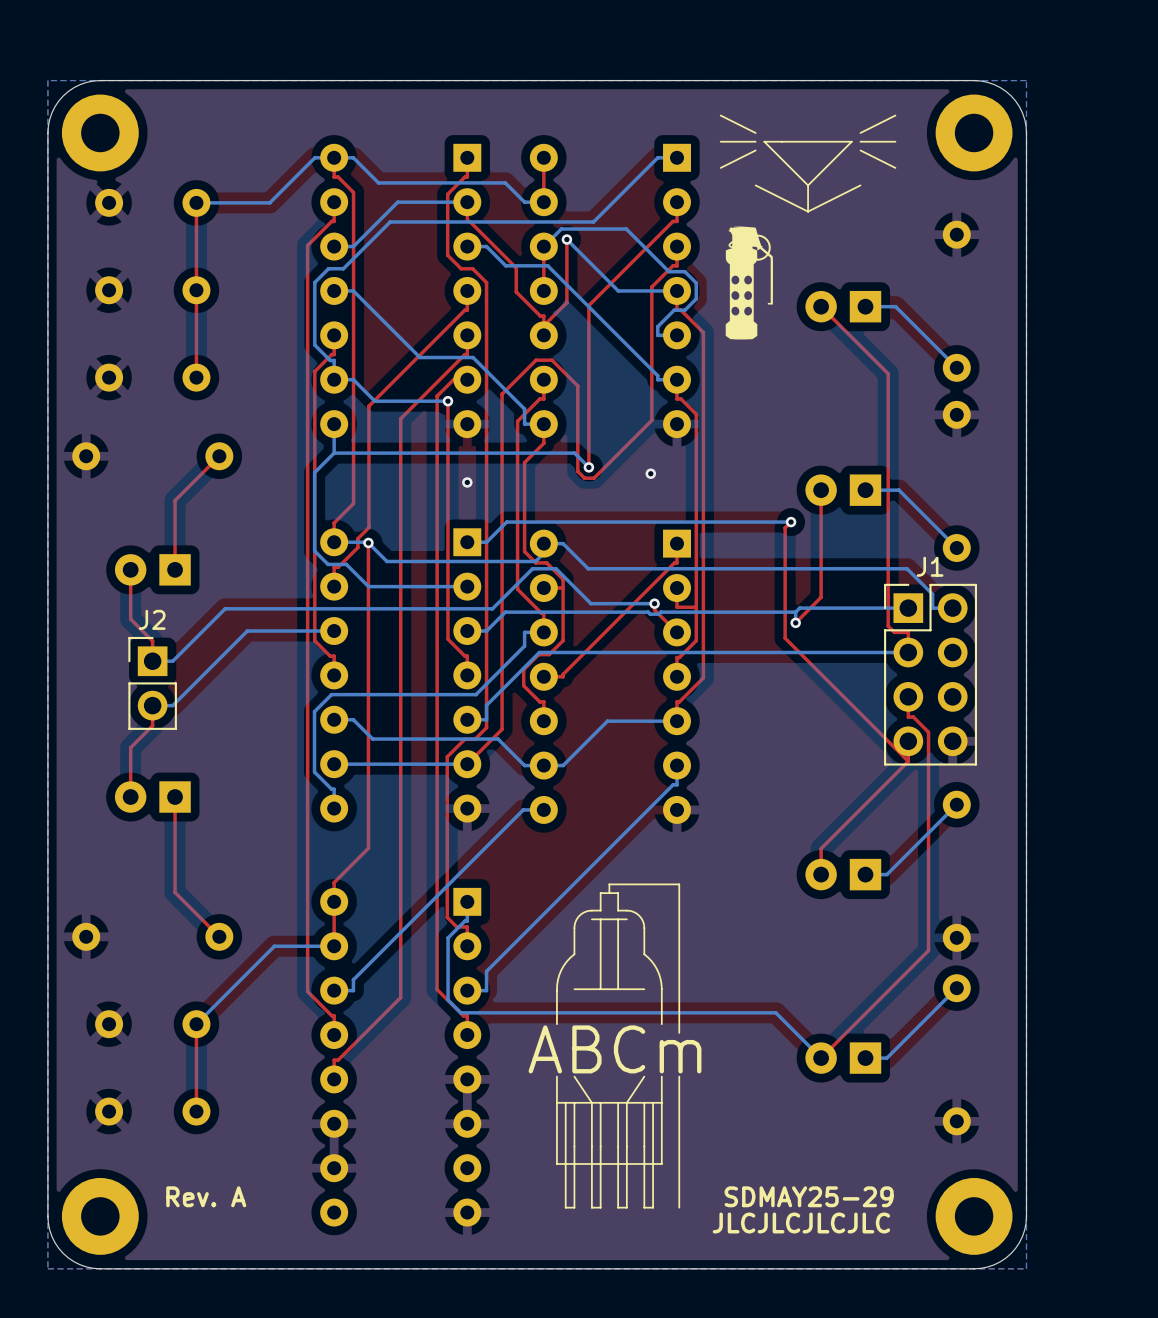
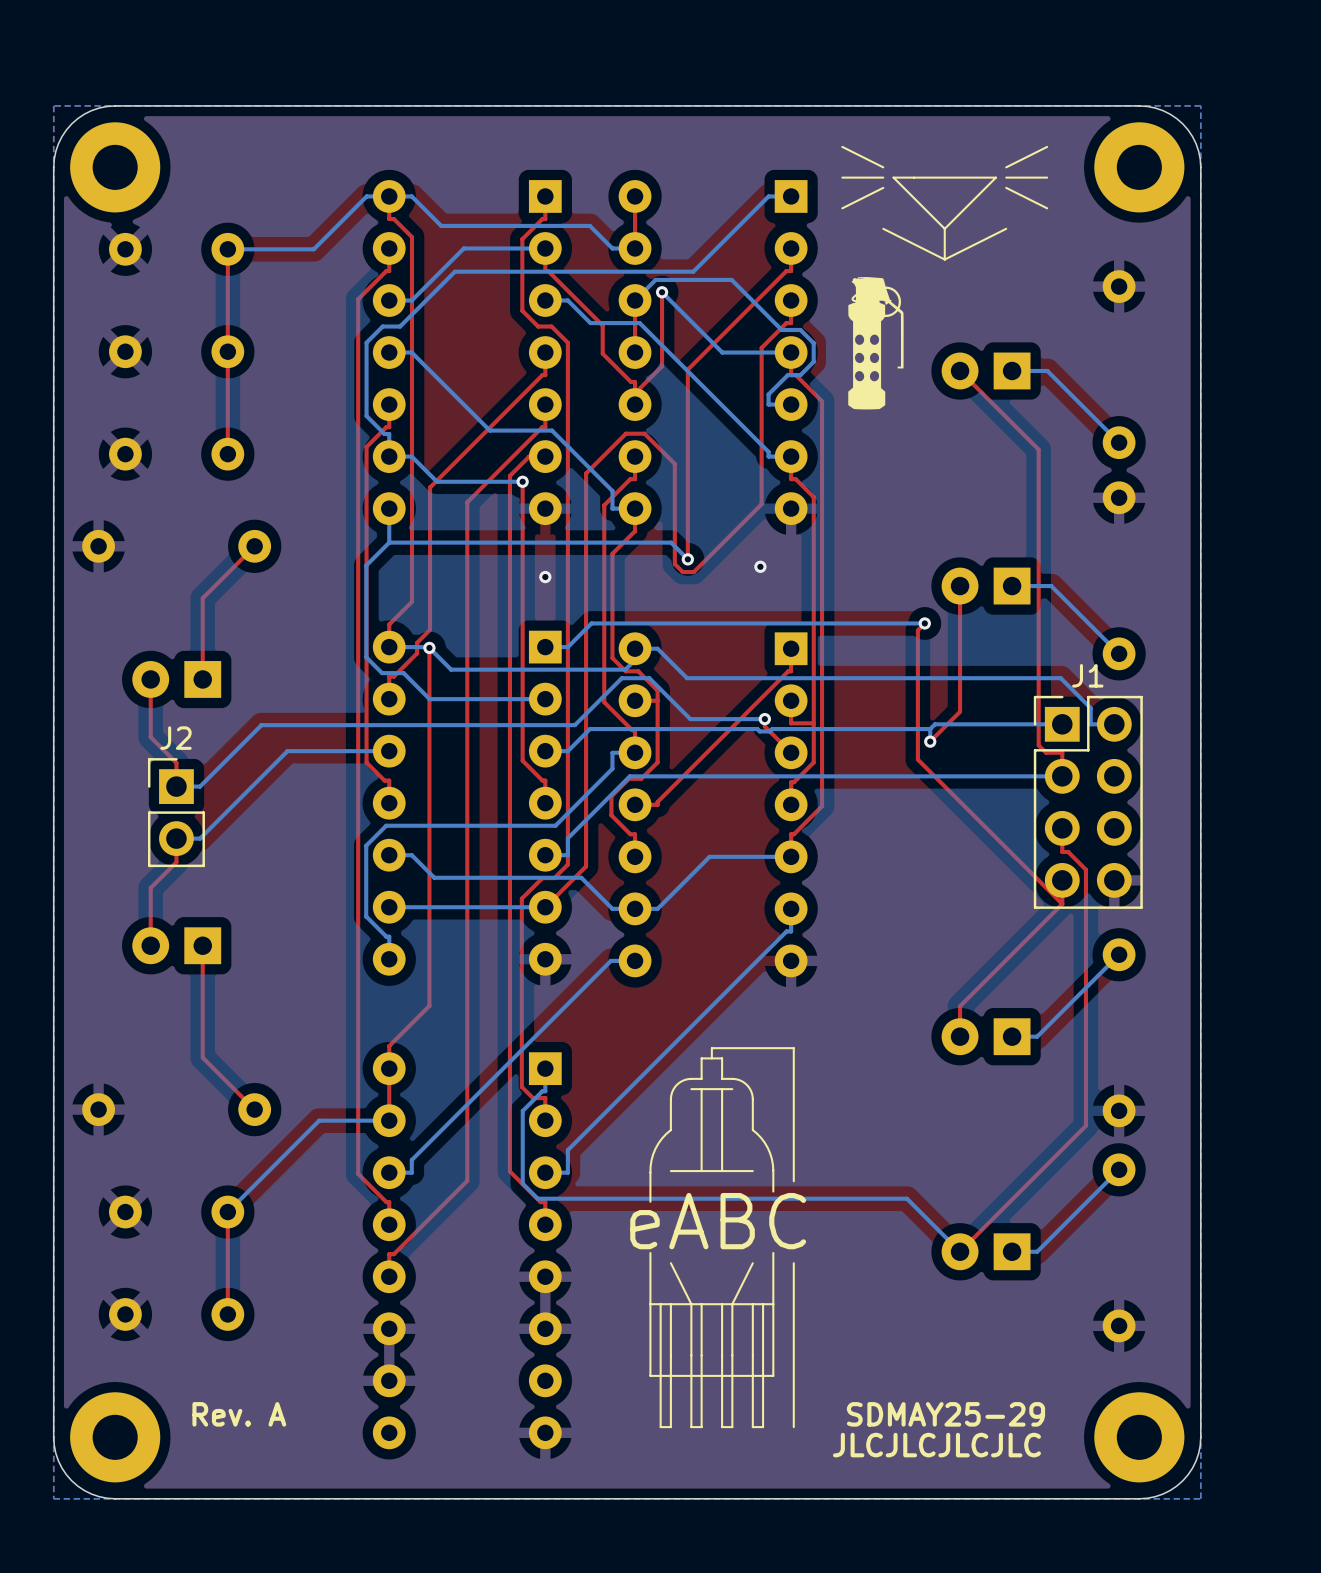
drawing shape: [528, 883, 702, 1209] -> [630, 1047, 807, 1429]

